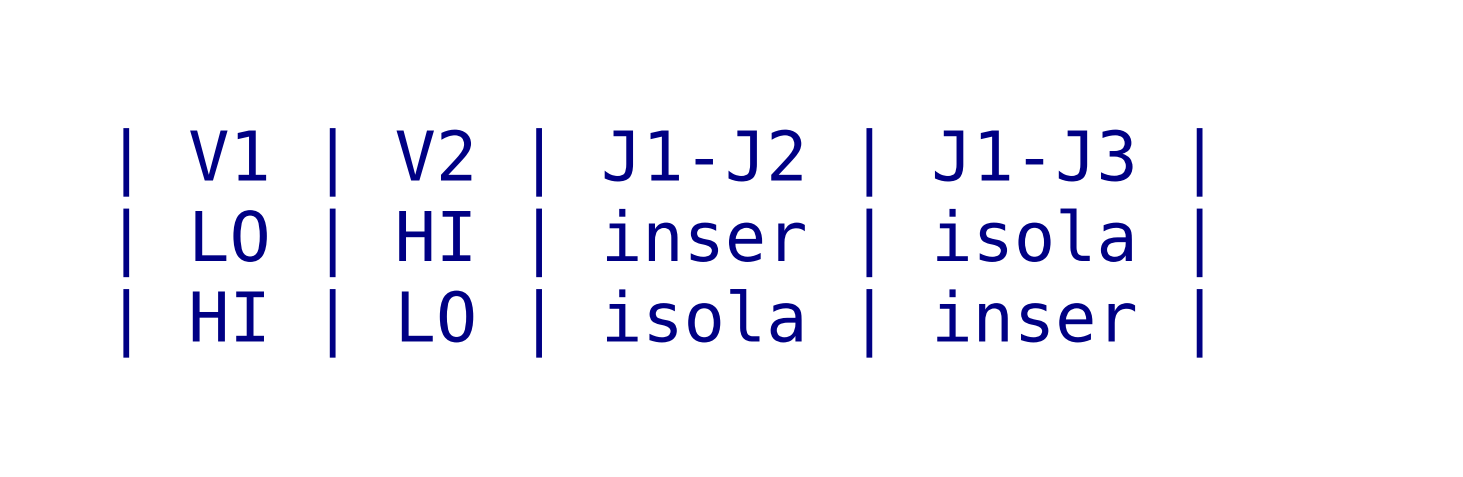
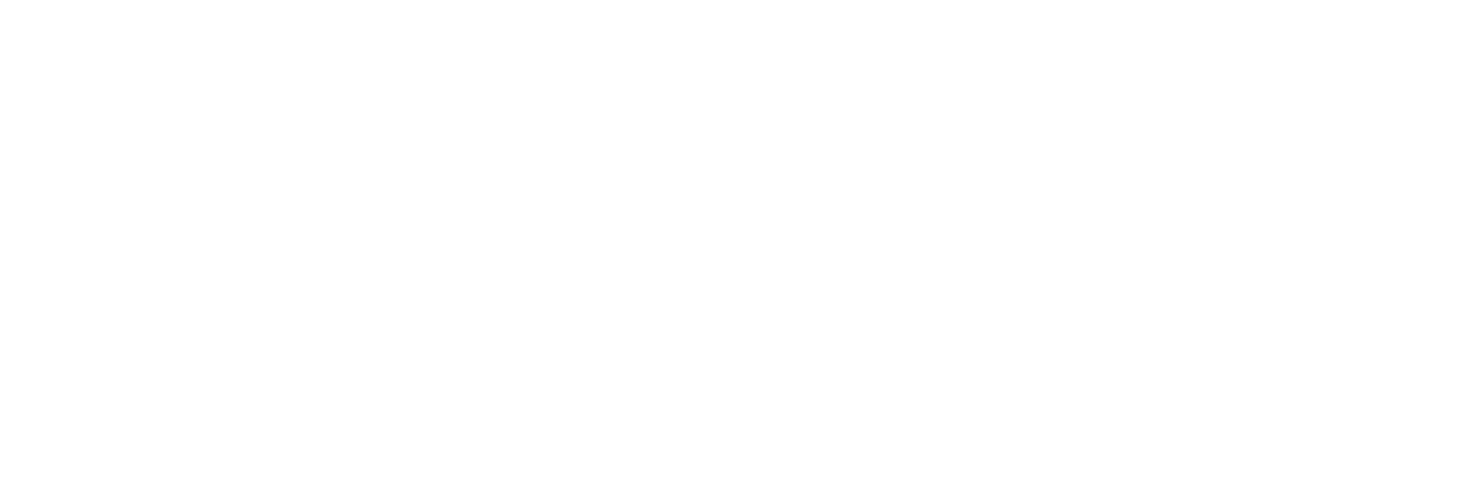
text: | V1 | V2 | J1-J2 | J1-J3 | (662, 162) -> none
text: | LO | HI | inser | isola | (662, 242) -> none
text: | HI | LO | isola | inser | (662, 323) -> none

